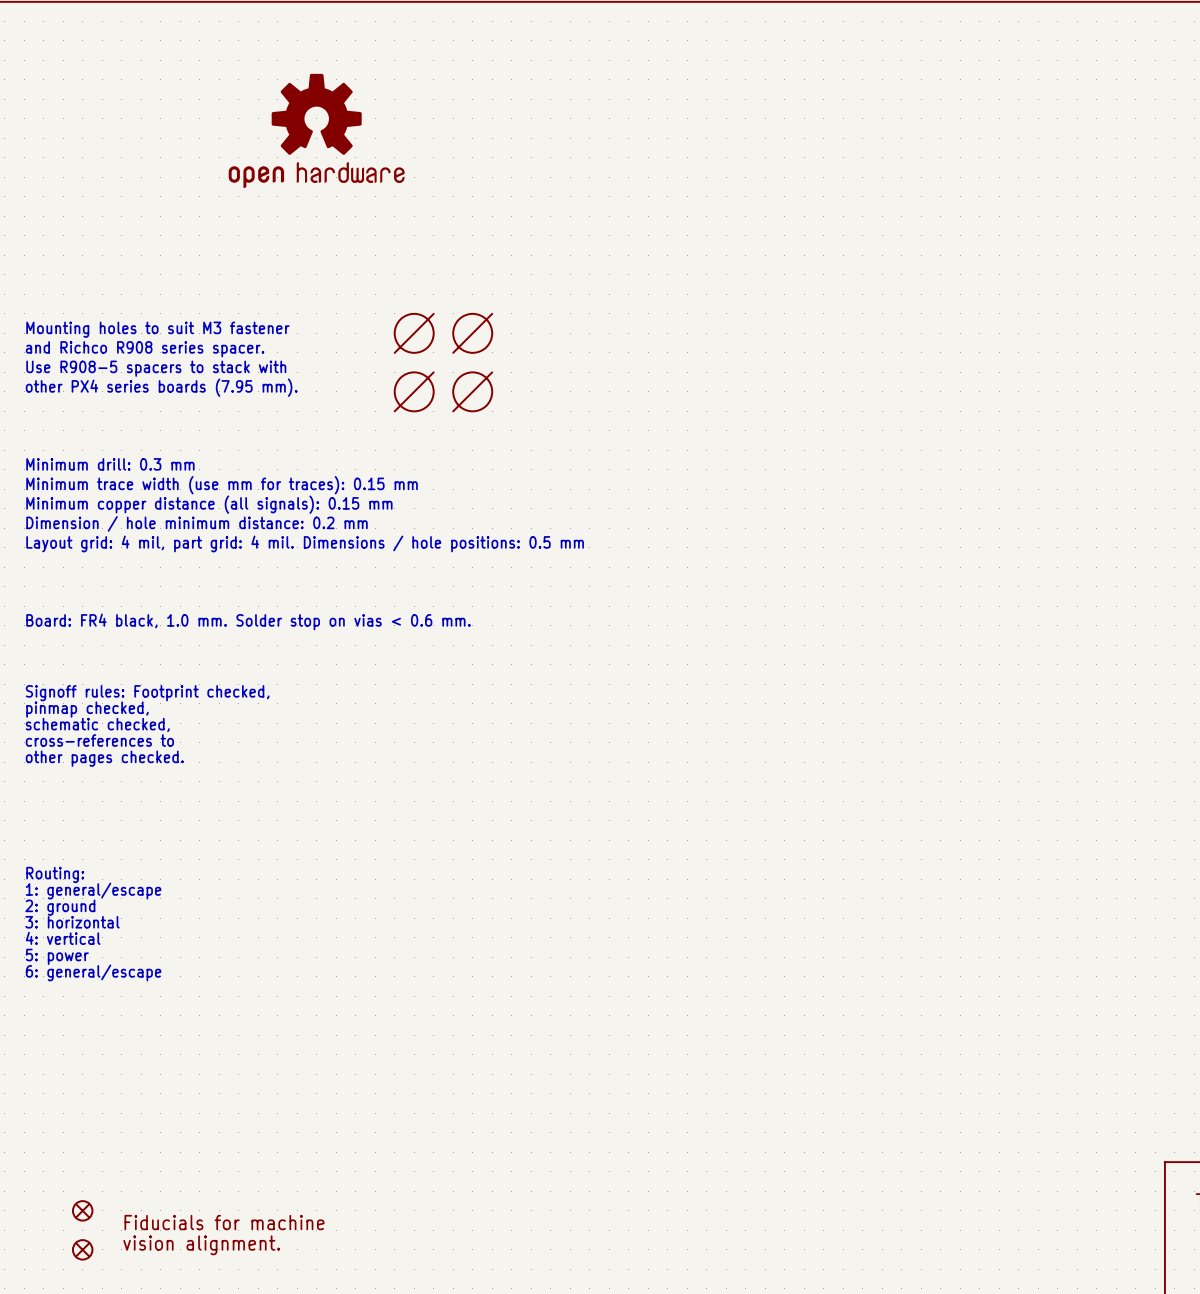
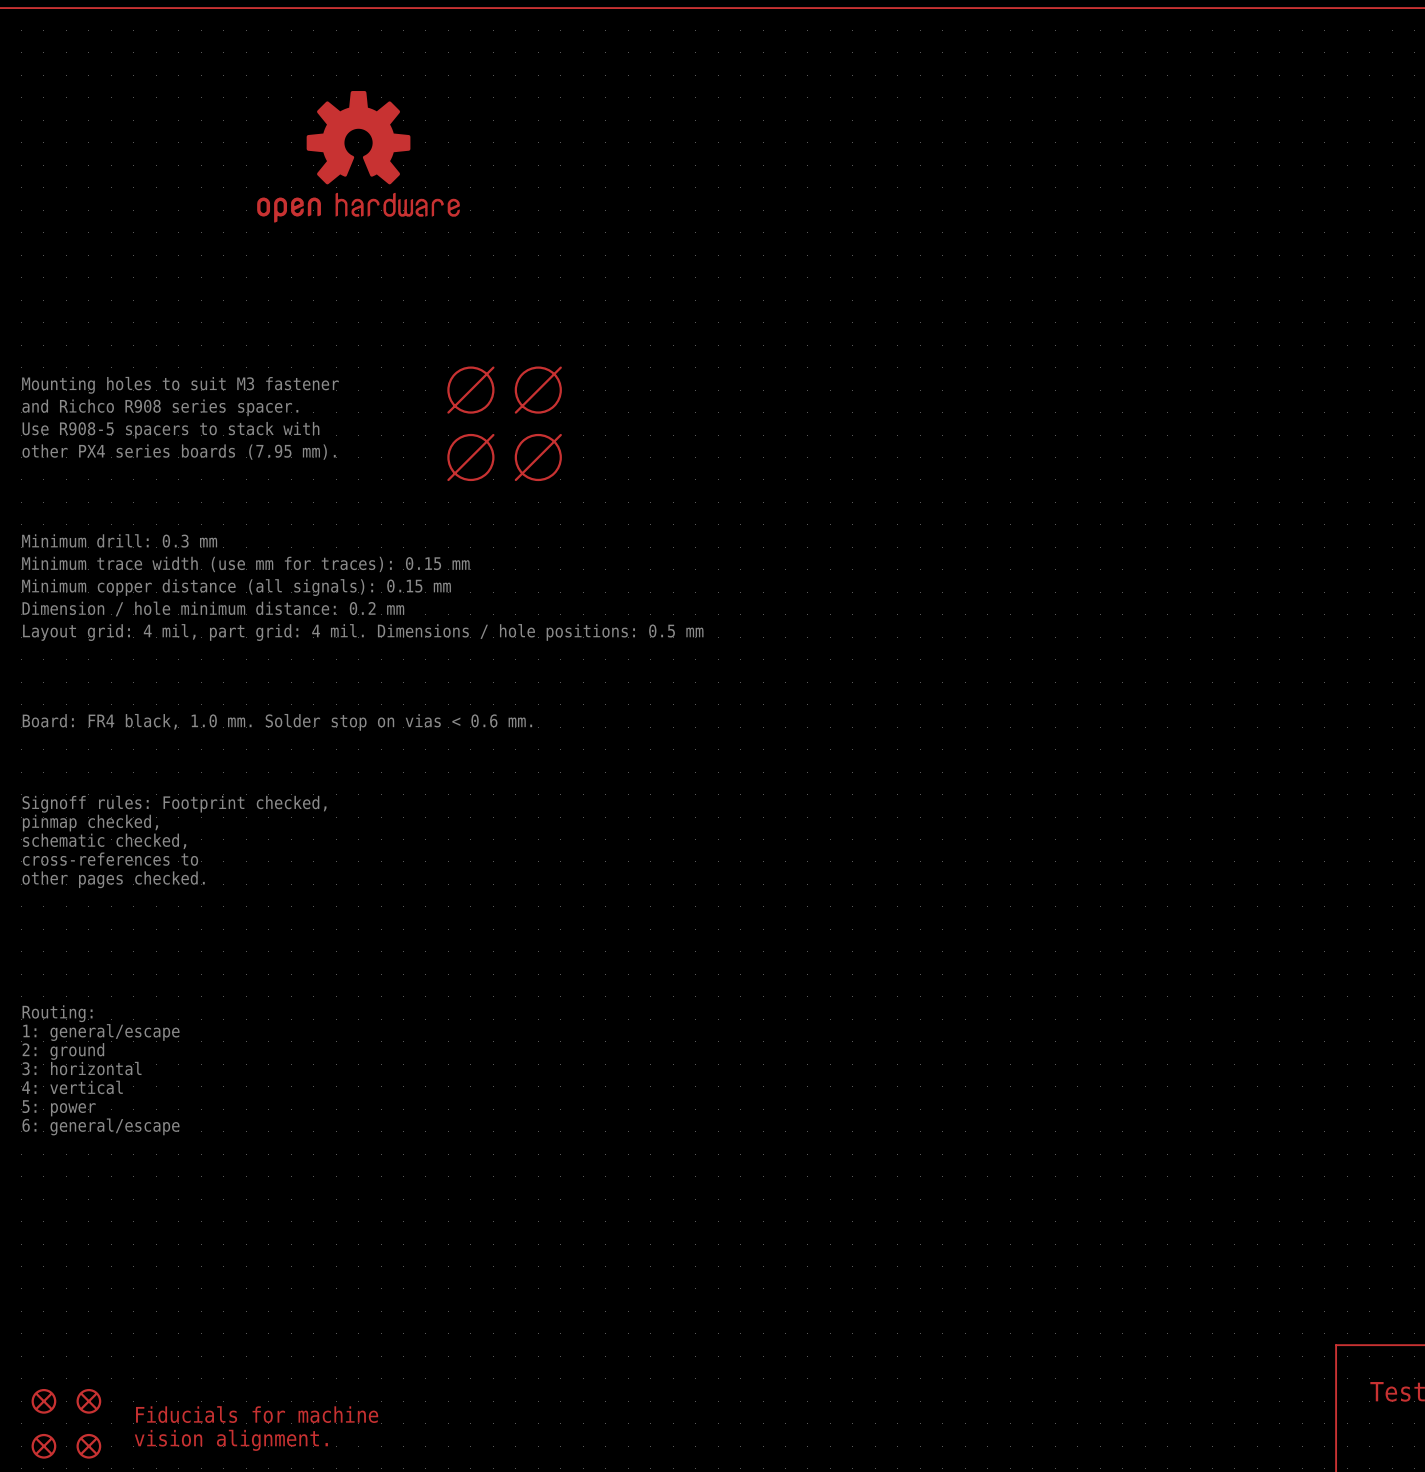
part: none -> (43, 1401)
part: none -> (43, 1446)

